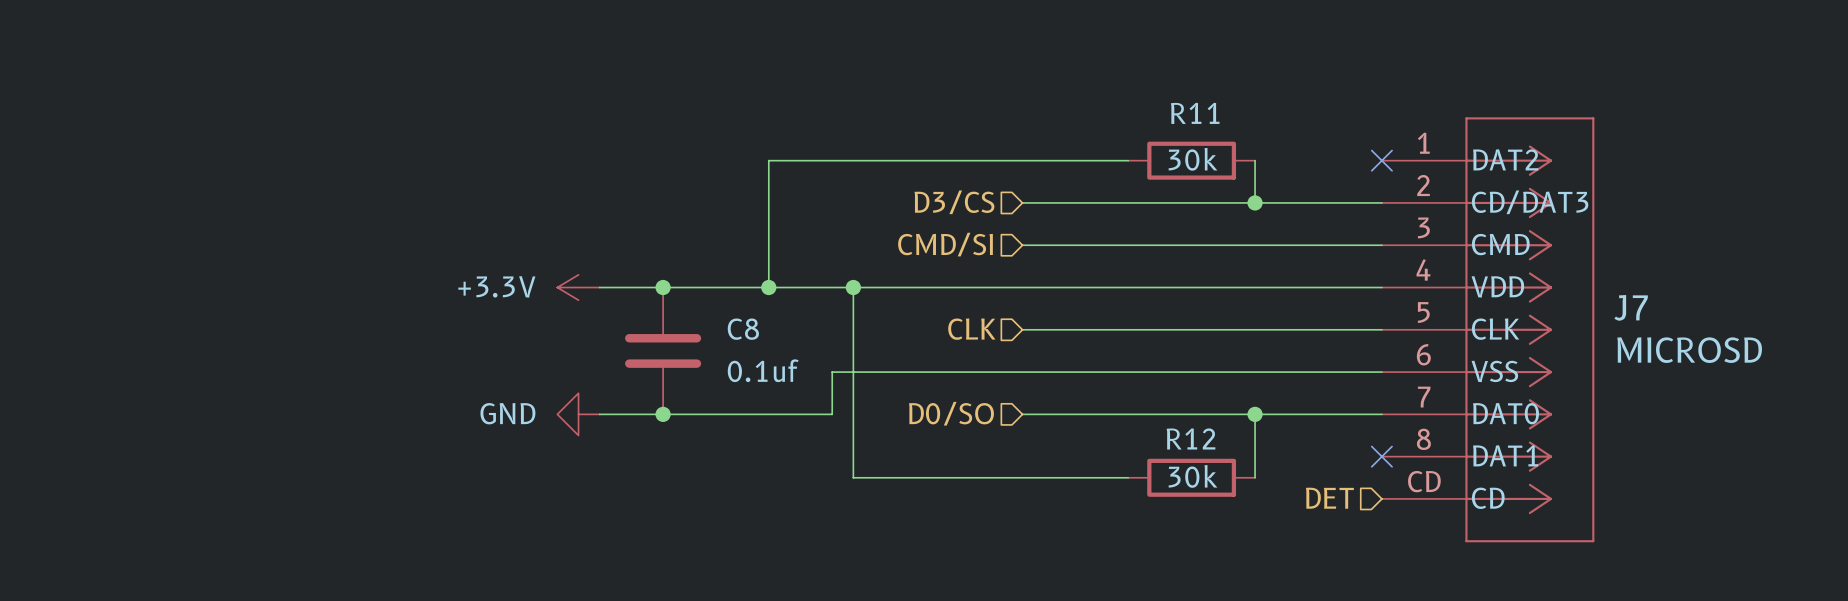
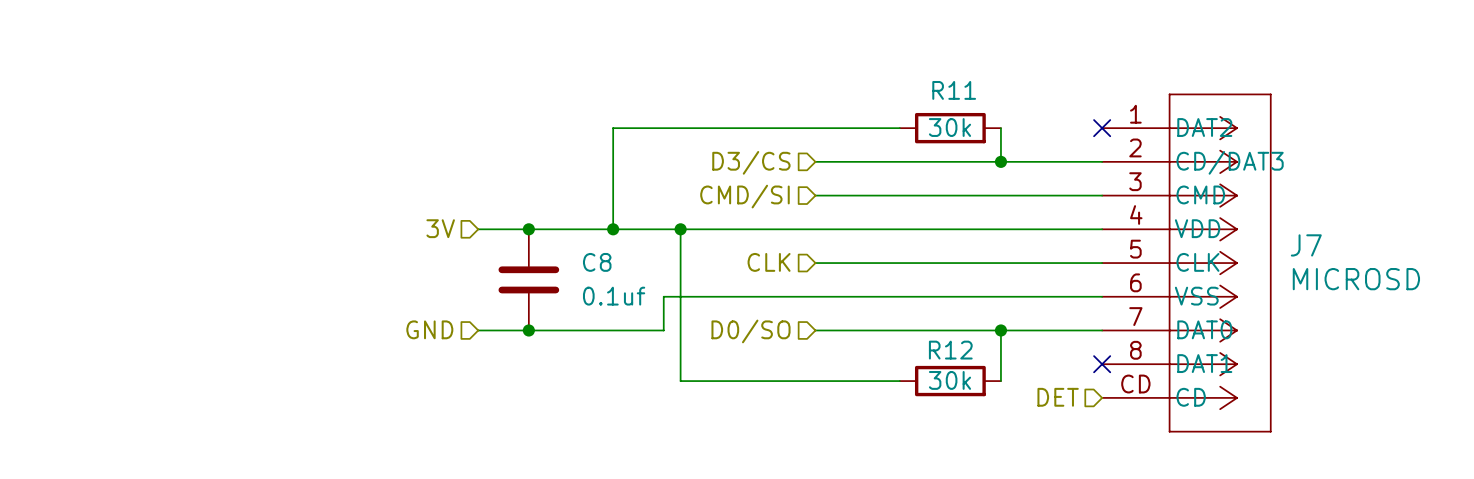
hierarchical label: none -> 3V (440, 228)
power symbol: +3.3V (578, 287) -> none
hierarchical label: none -> GND (429, 329)
power symbol: GND (578, 414) -> none

